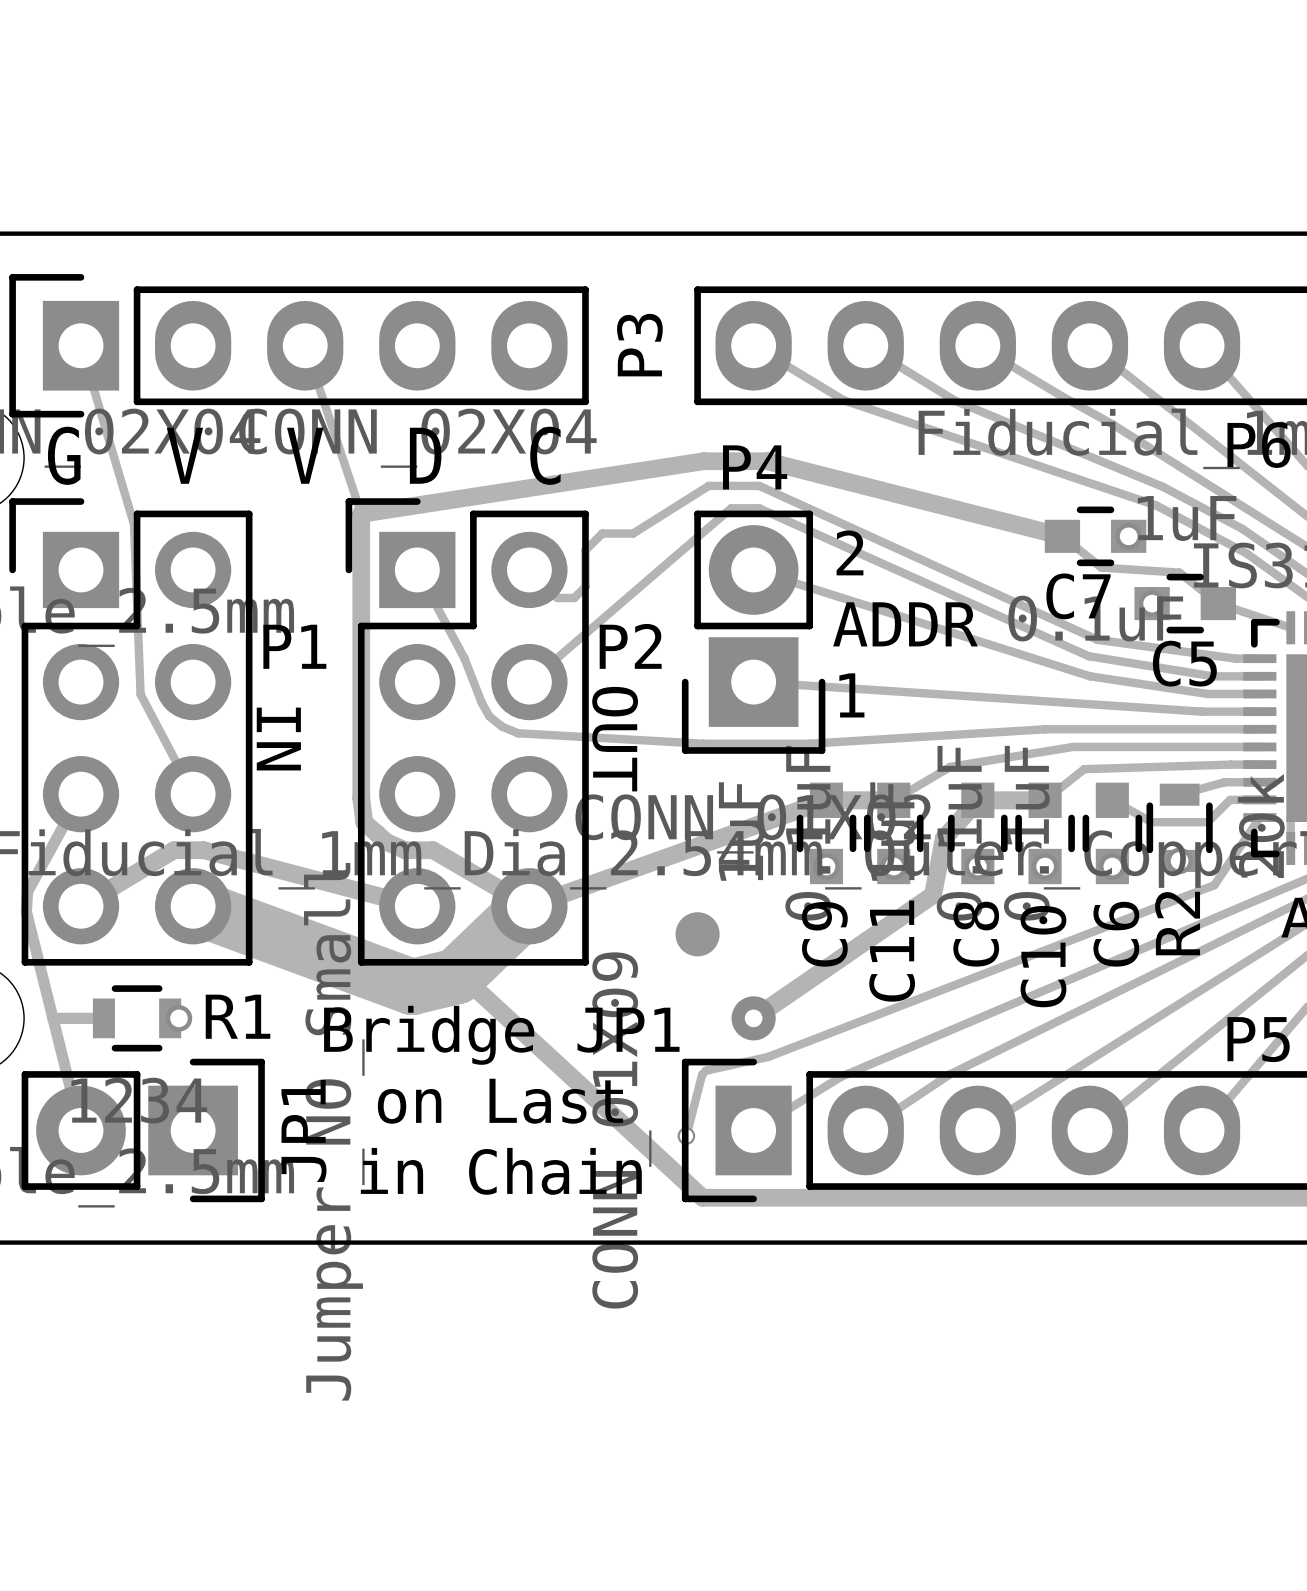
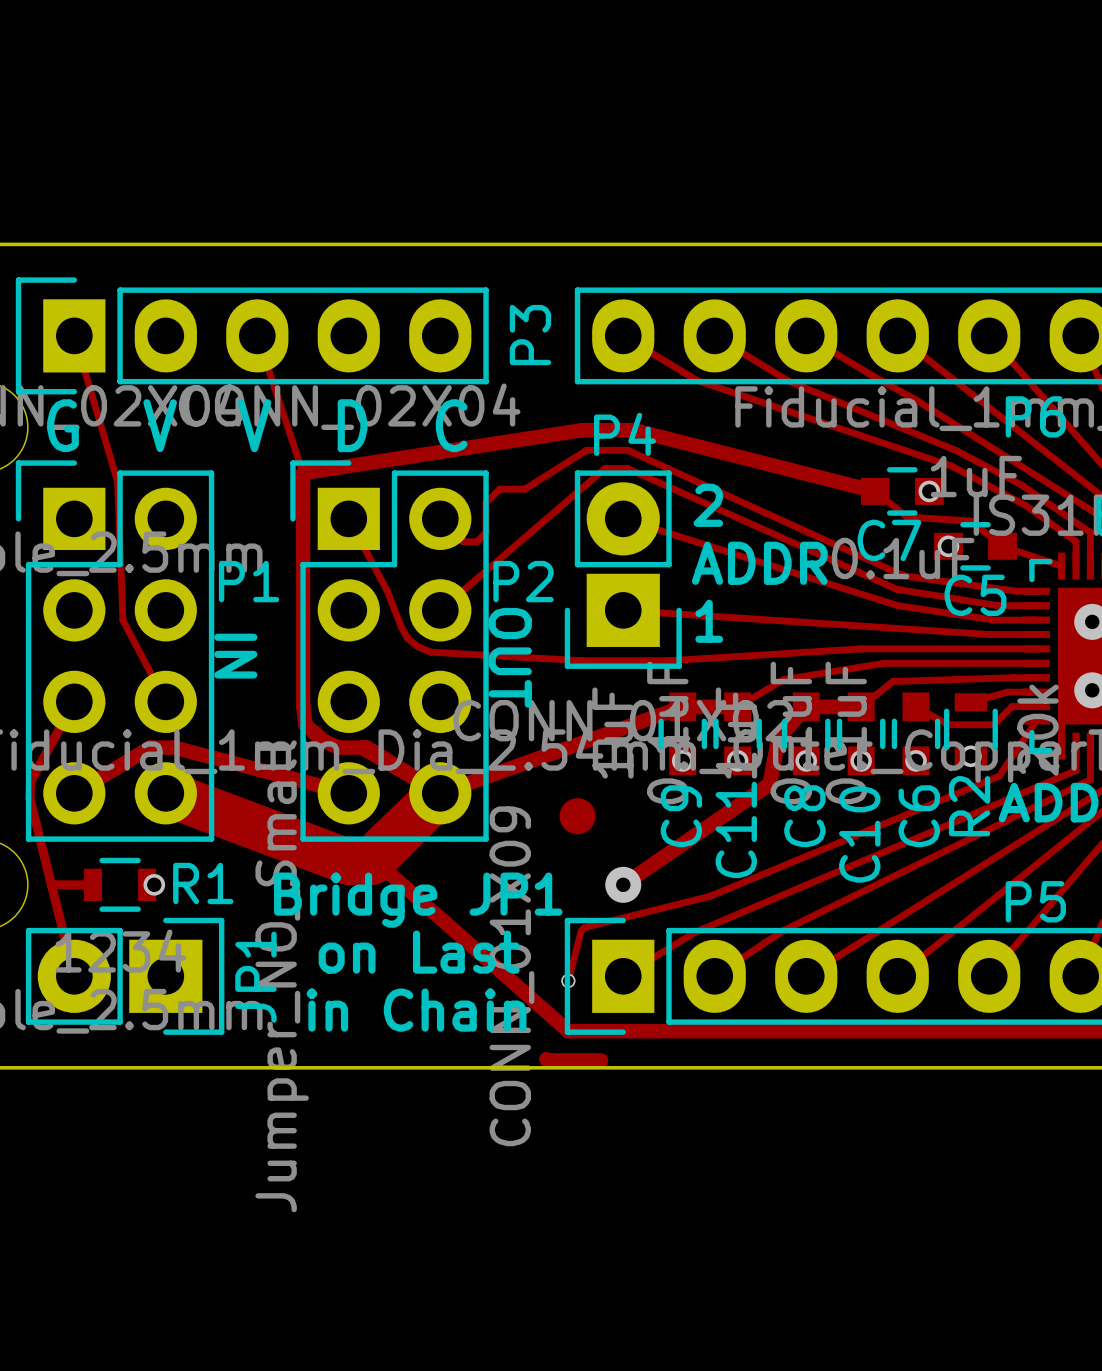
track: none -> (361, 747) (367, 747) (440, 793) (371, 861) (348, 861) (165, 793)
track: (1214, 885) (769, 1056) -> (999, 776) (711, 895)
track: (193, 906) (412, 986) (456, 976) (459, 973) (702, 1197) -> (373, 859) (568, 1031) (581, 1031)
track: (768, 1056) (706, 1070) -> (710, 896) (584, 927)
track: none -> (546, 1059) (600, 1060)

